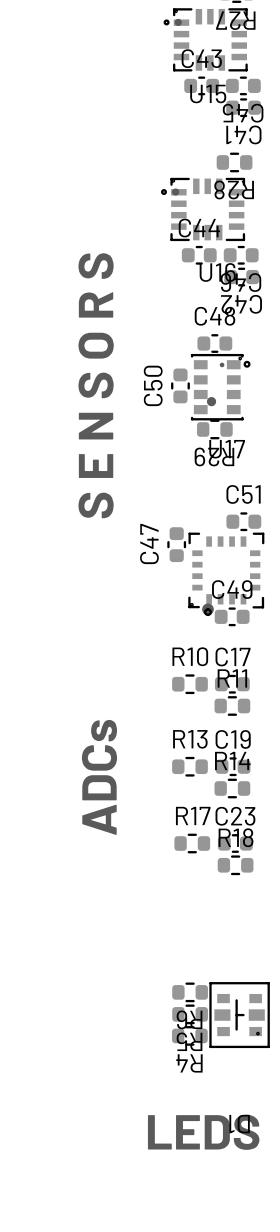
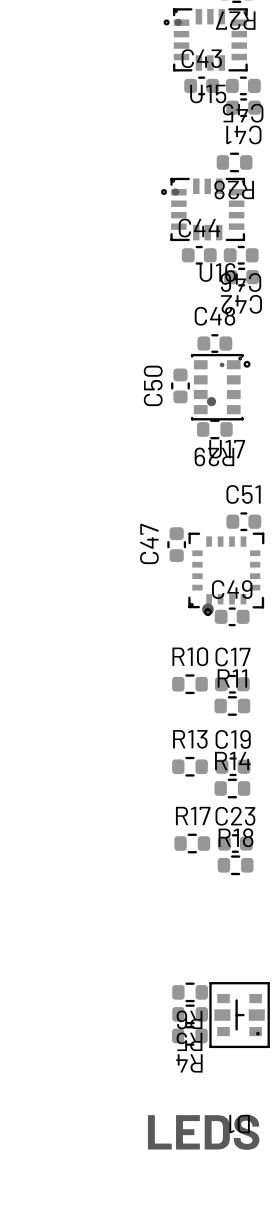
text: S E N S O R S (96, 385) -> none
text: ADCs (99, 777) -> none

